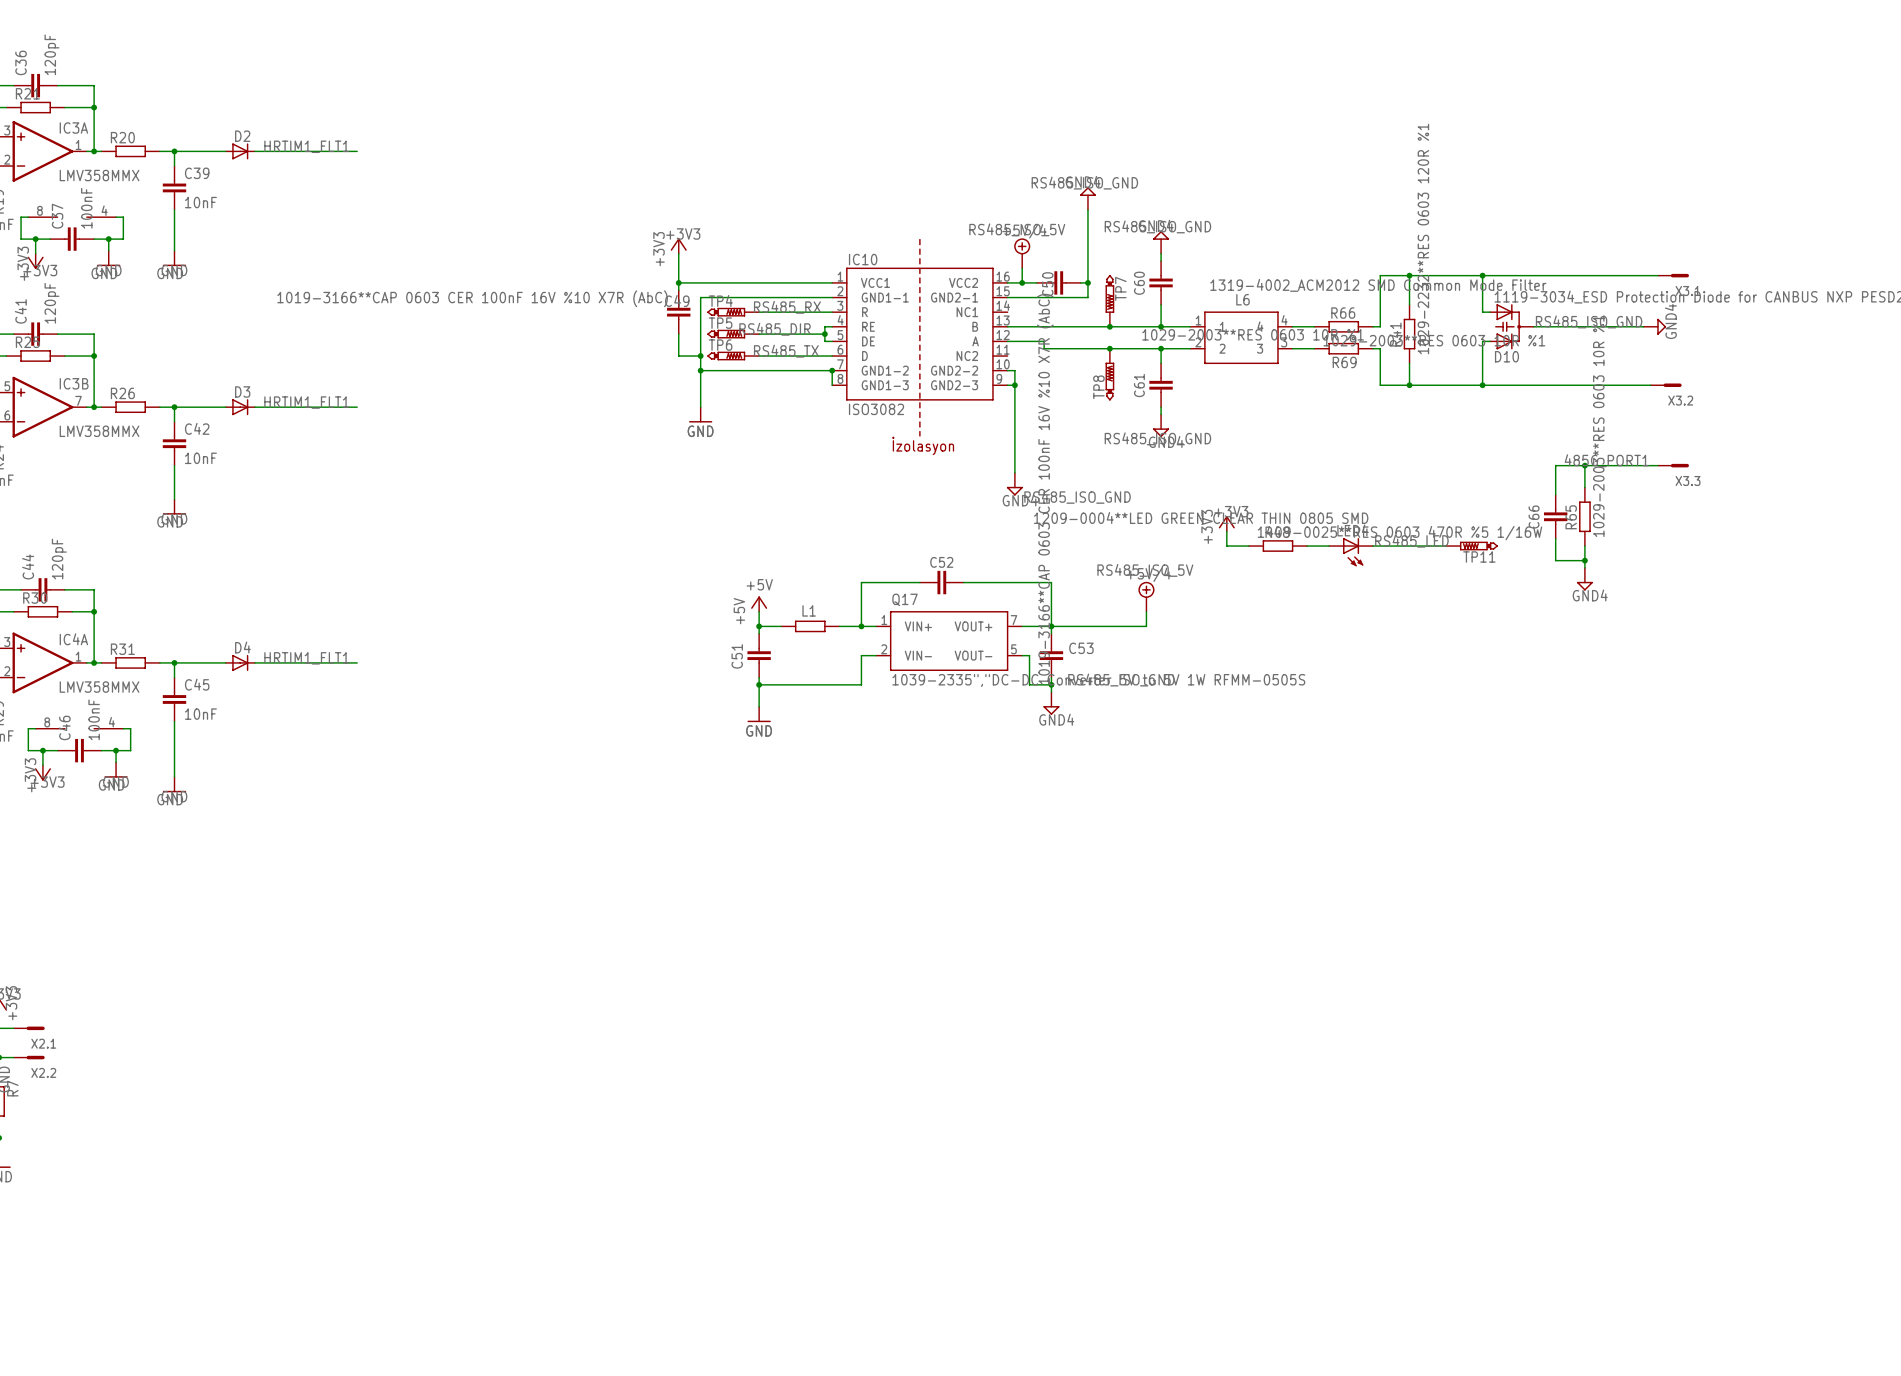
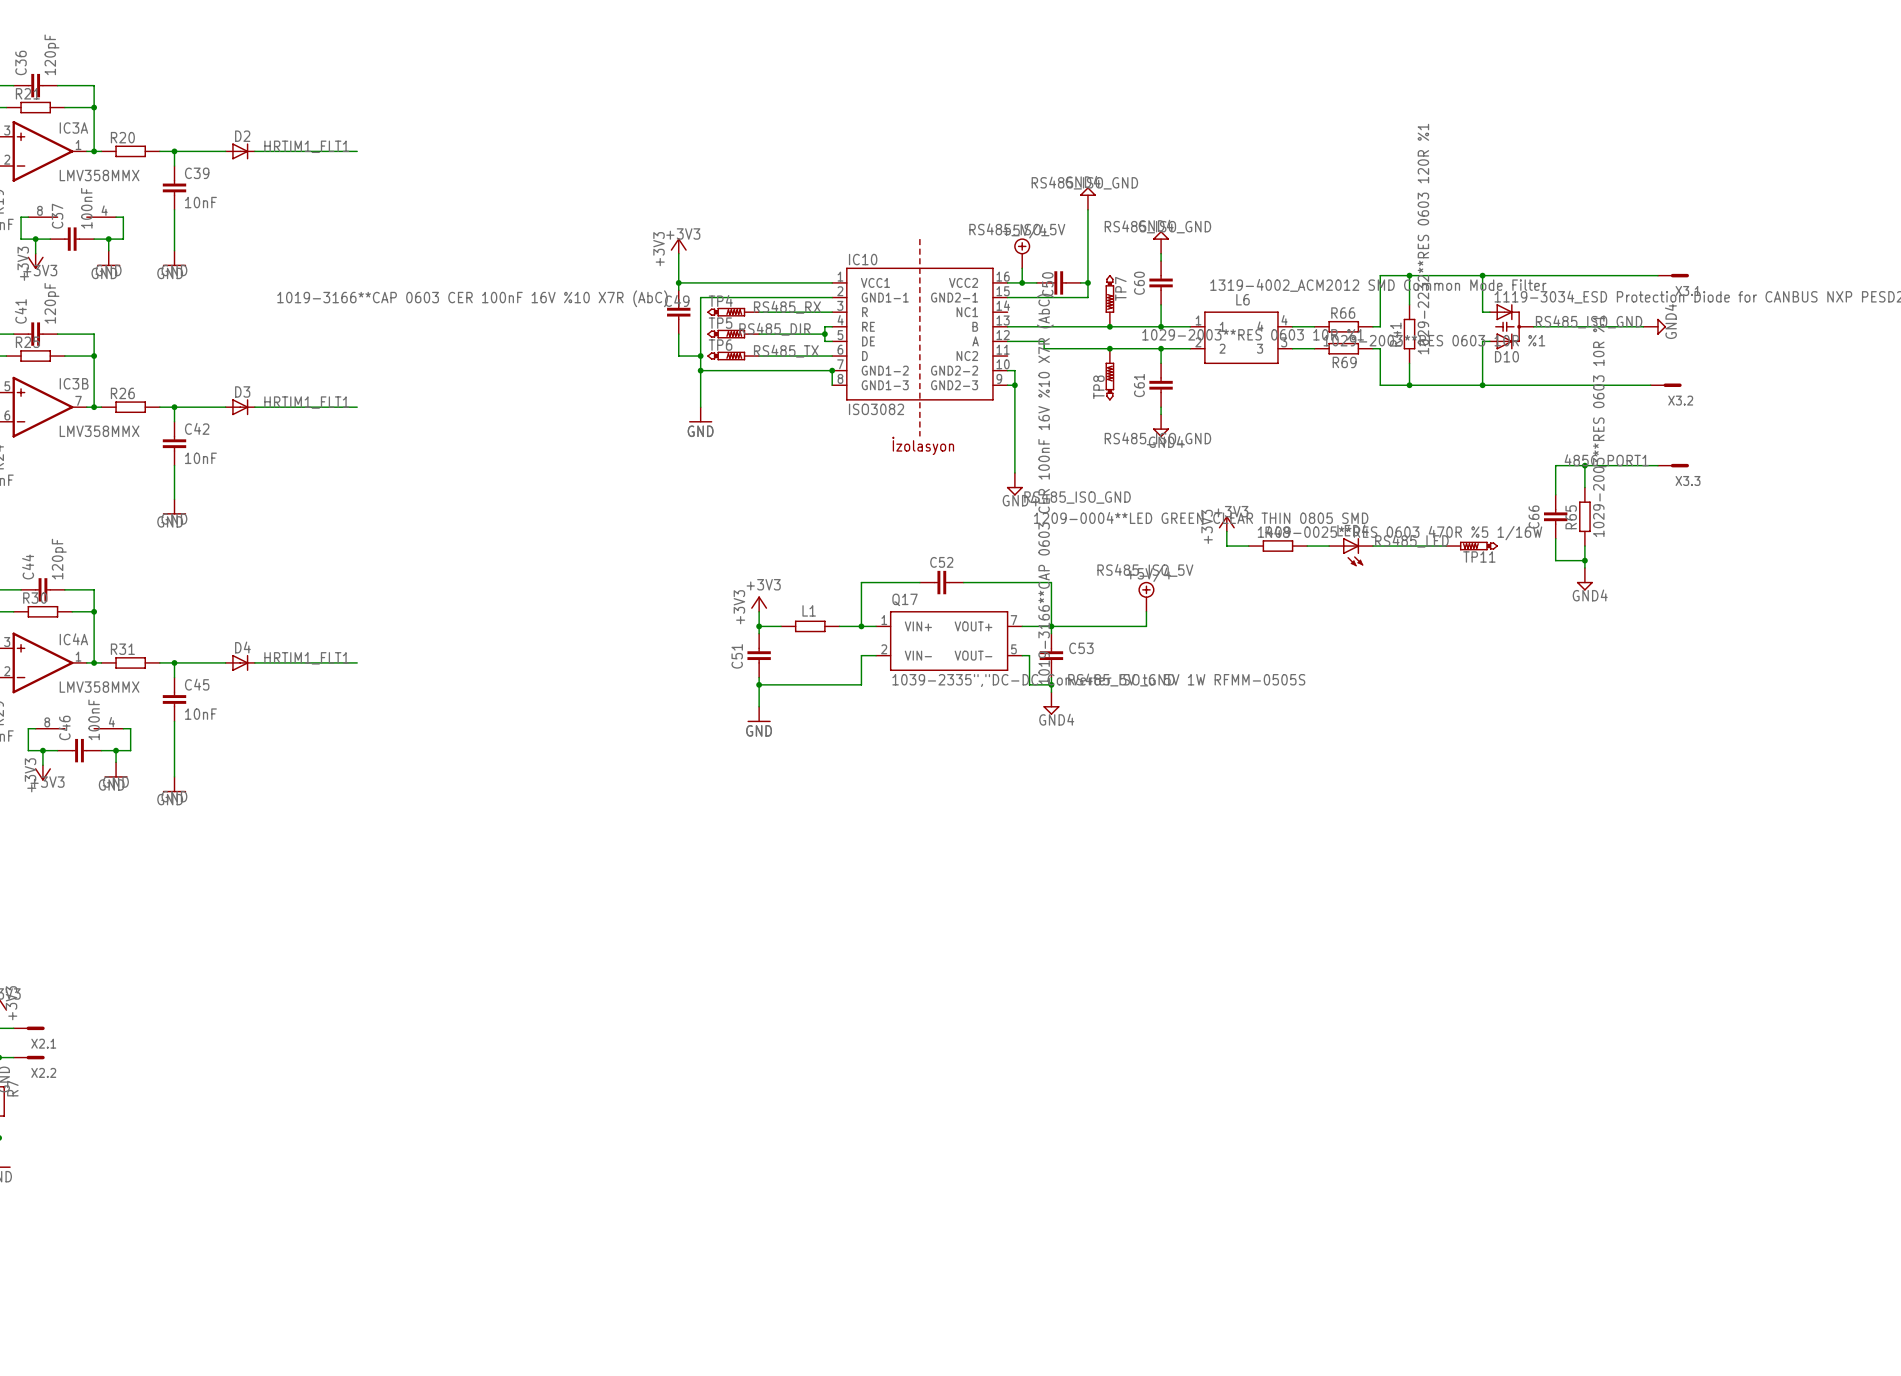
label: +5V (759, 584) -> +3V3 (763, 584)
power symbol: +5V (759, 604) -> +3V3 (759, 604)

